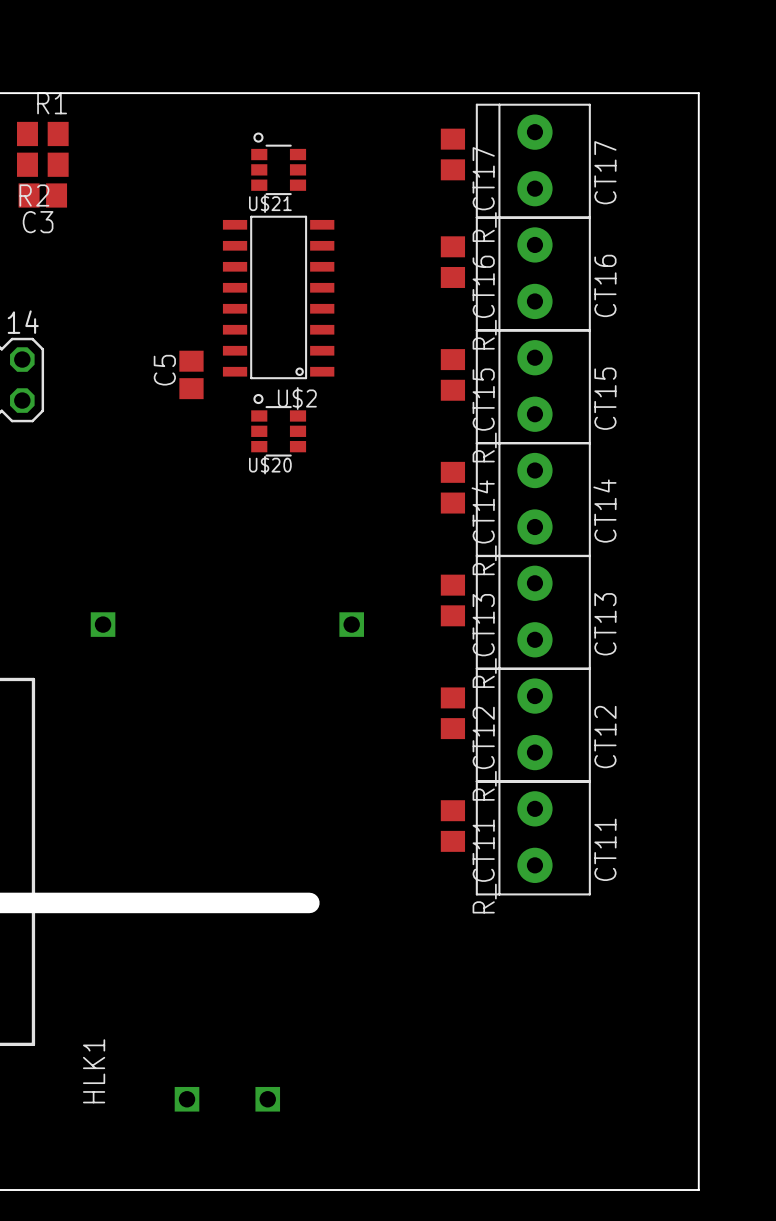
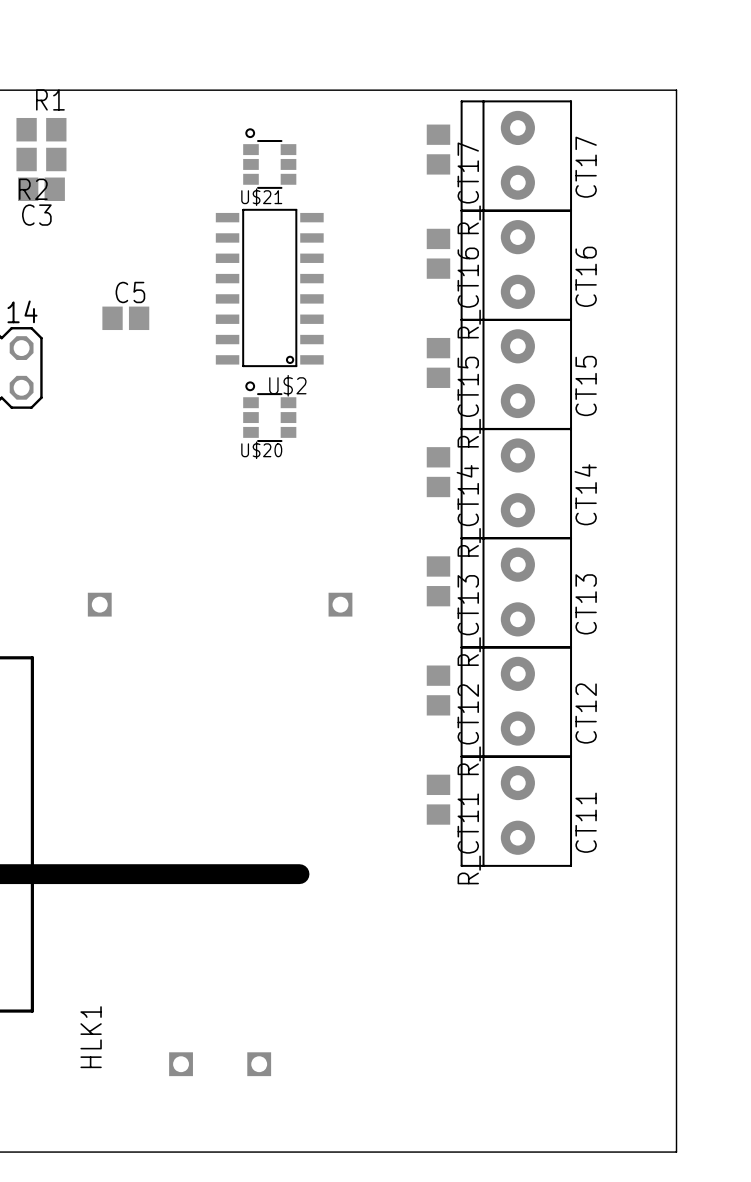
C5 rotation: 0° (191, 374) -> 90° clockwise (125, 318)
C5 position: (191, 374) -> (125, 318)

